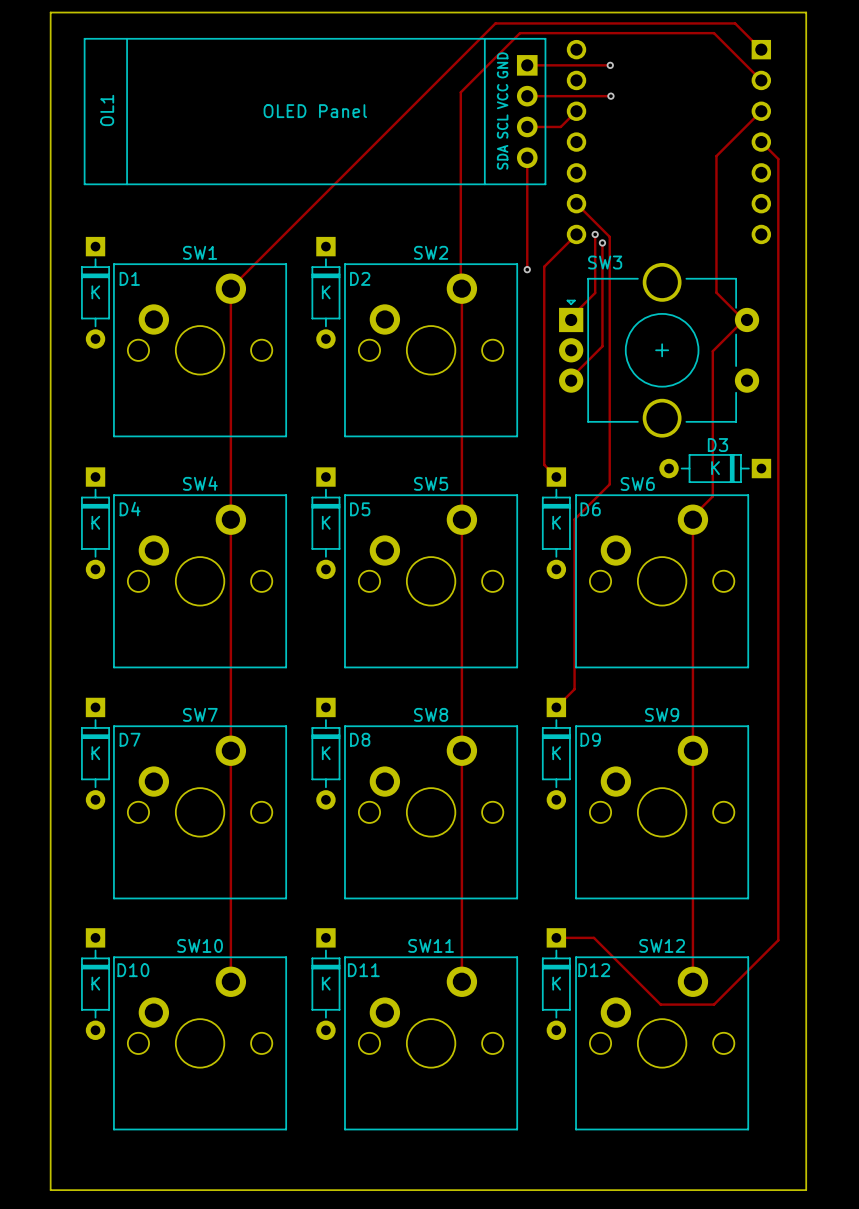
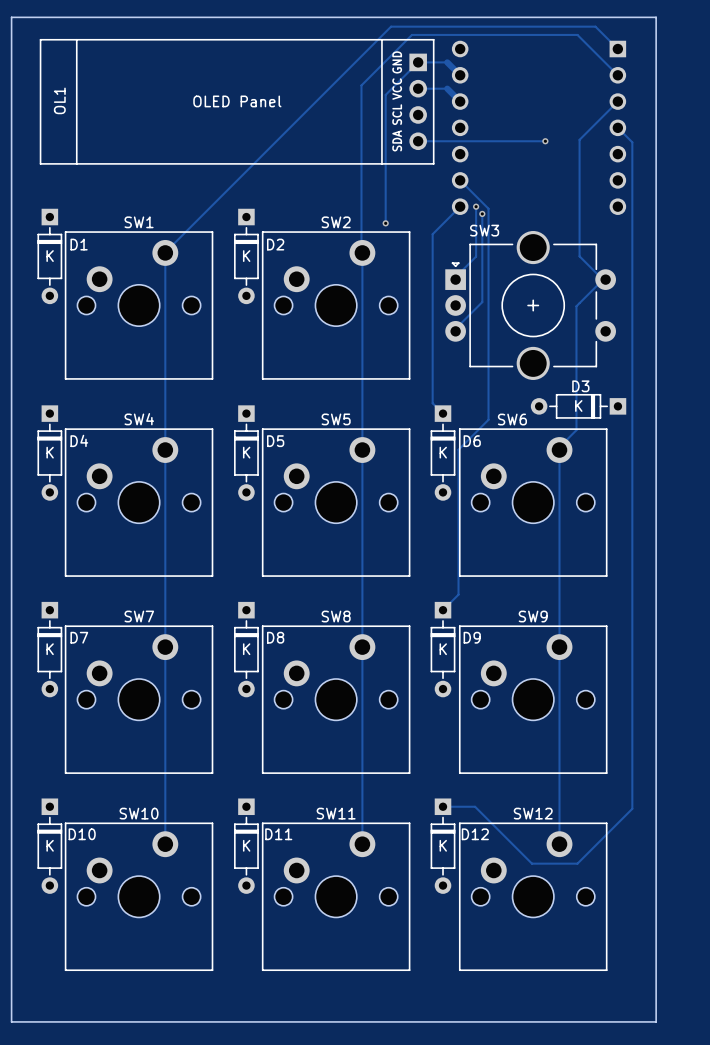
track: none -> (418, 62) (385, 94) (385, 223)
track: (561, 65) (610, 65) -> (447, 62) (460, 75)
via: (610, 65) -> none
track: (561, 96) (610, 96) -> (447, 88) (460, 101)
via: (610, 96) -> none
track: (576, 111) (560, 126) (527, 126) -> none
track: (527, 157) (527, 269) -> (418, 141) (545, 141)
via: none -> (545, 141)
via position: (527, 269) -> (385, 223)

